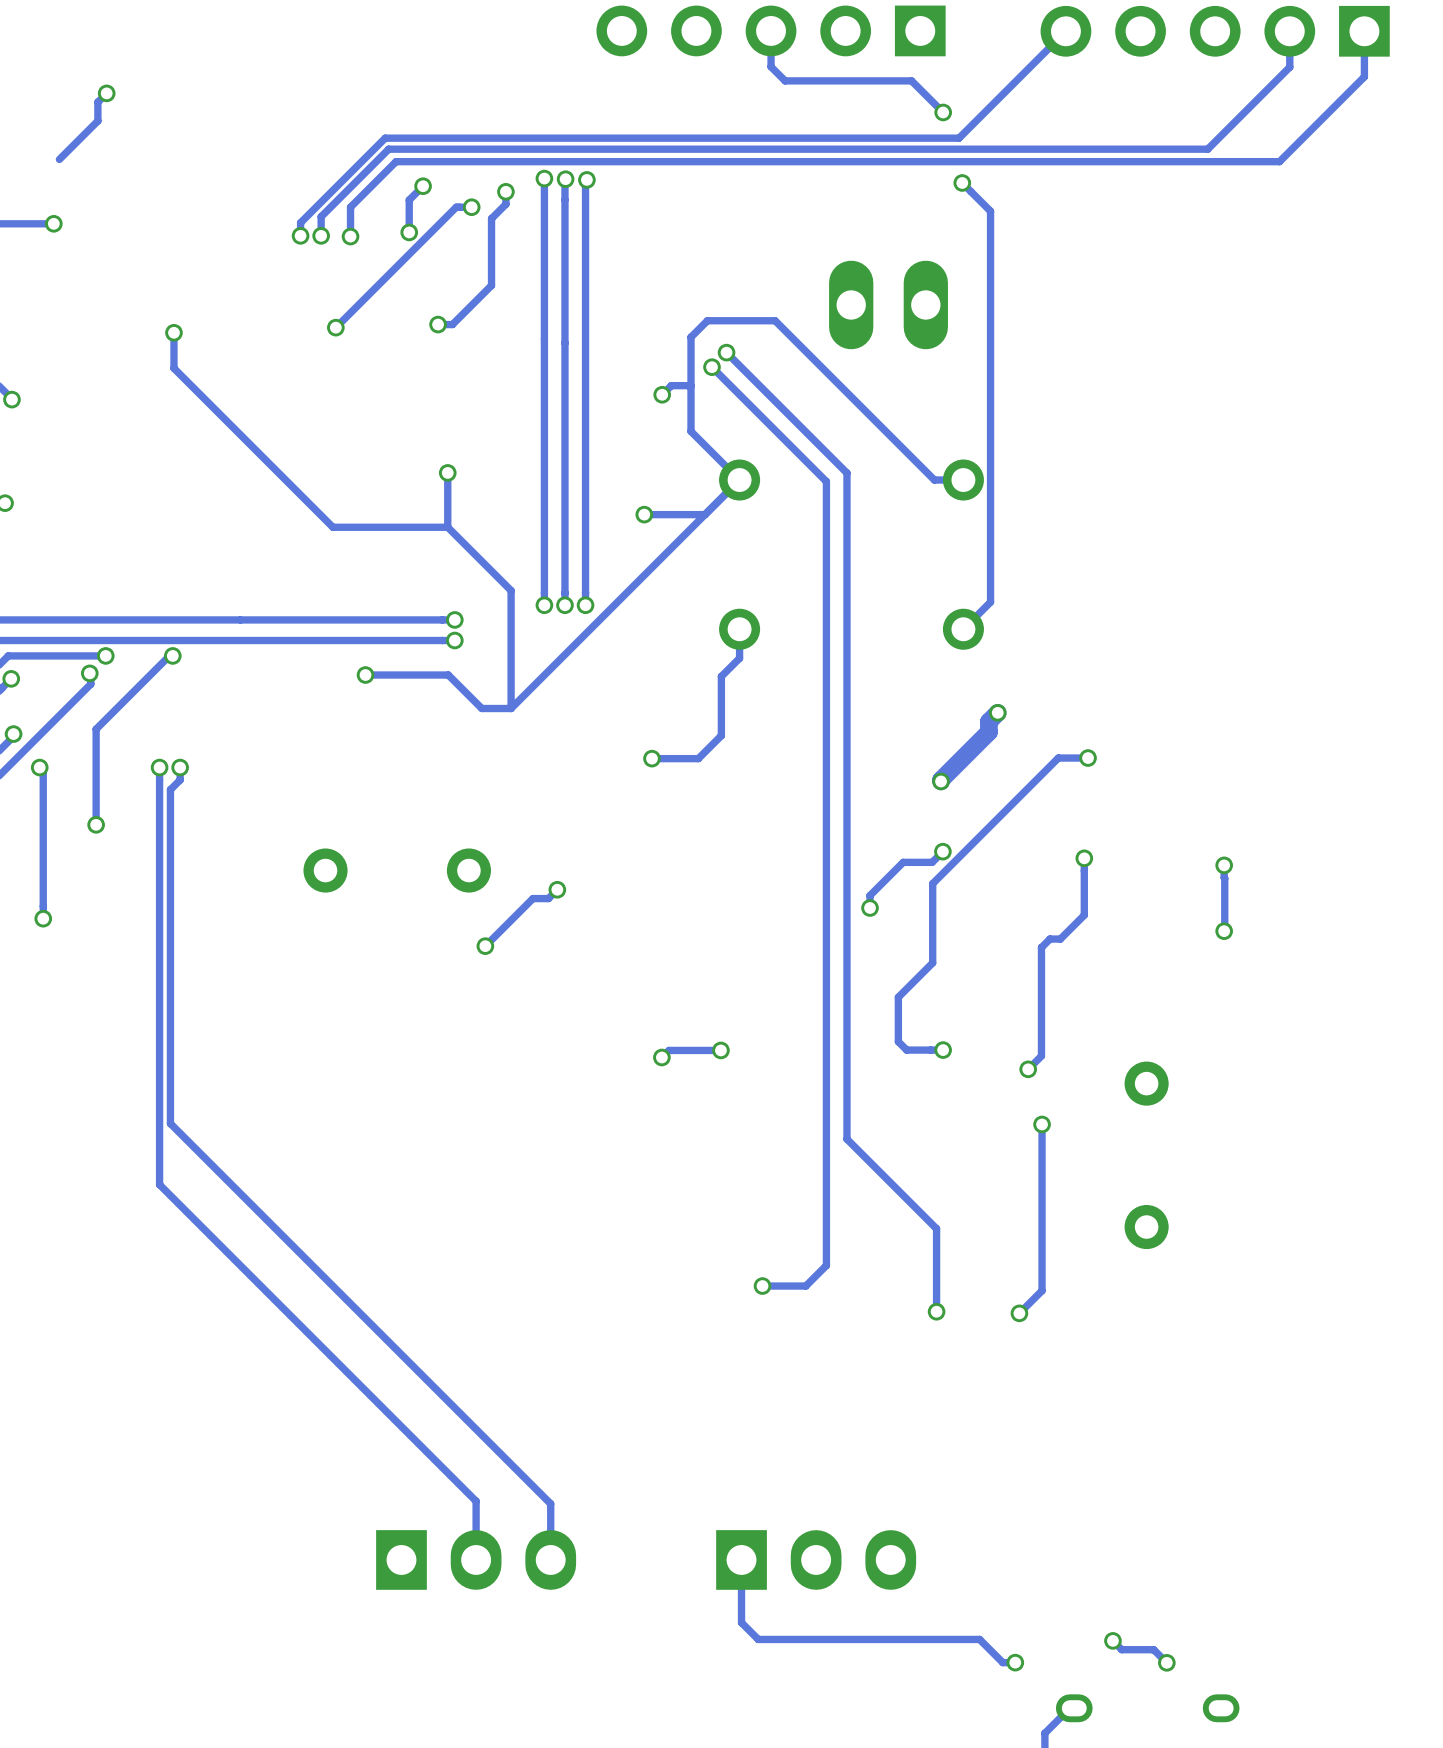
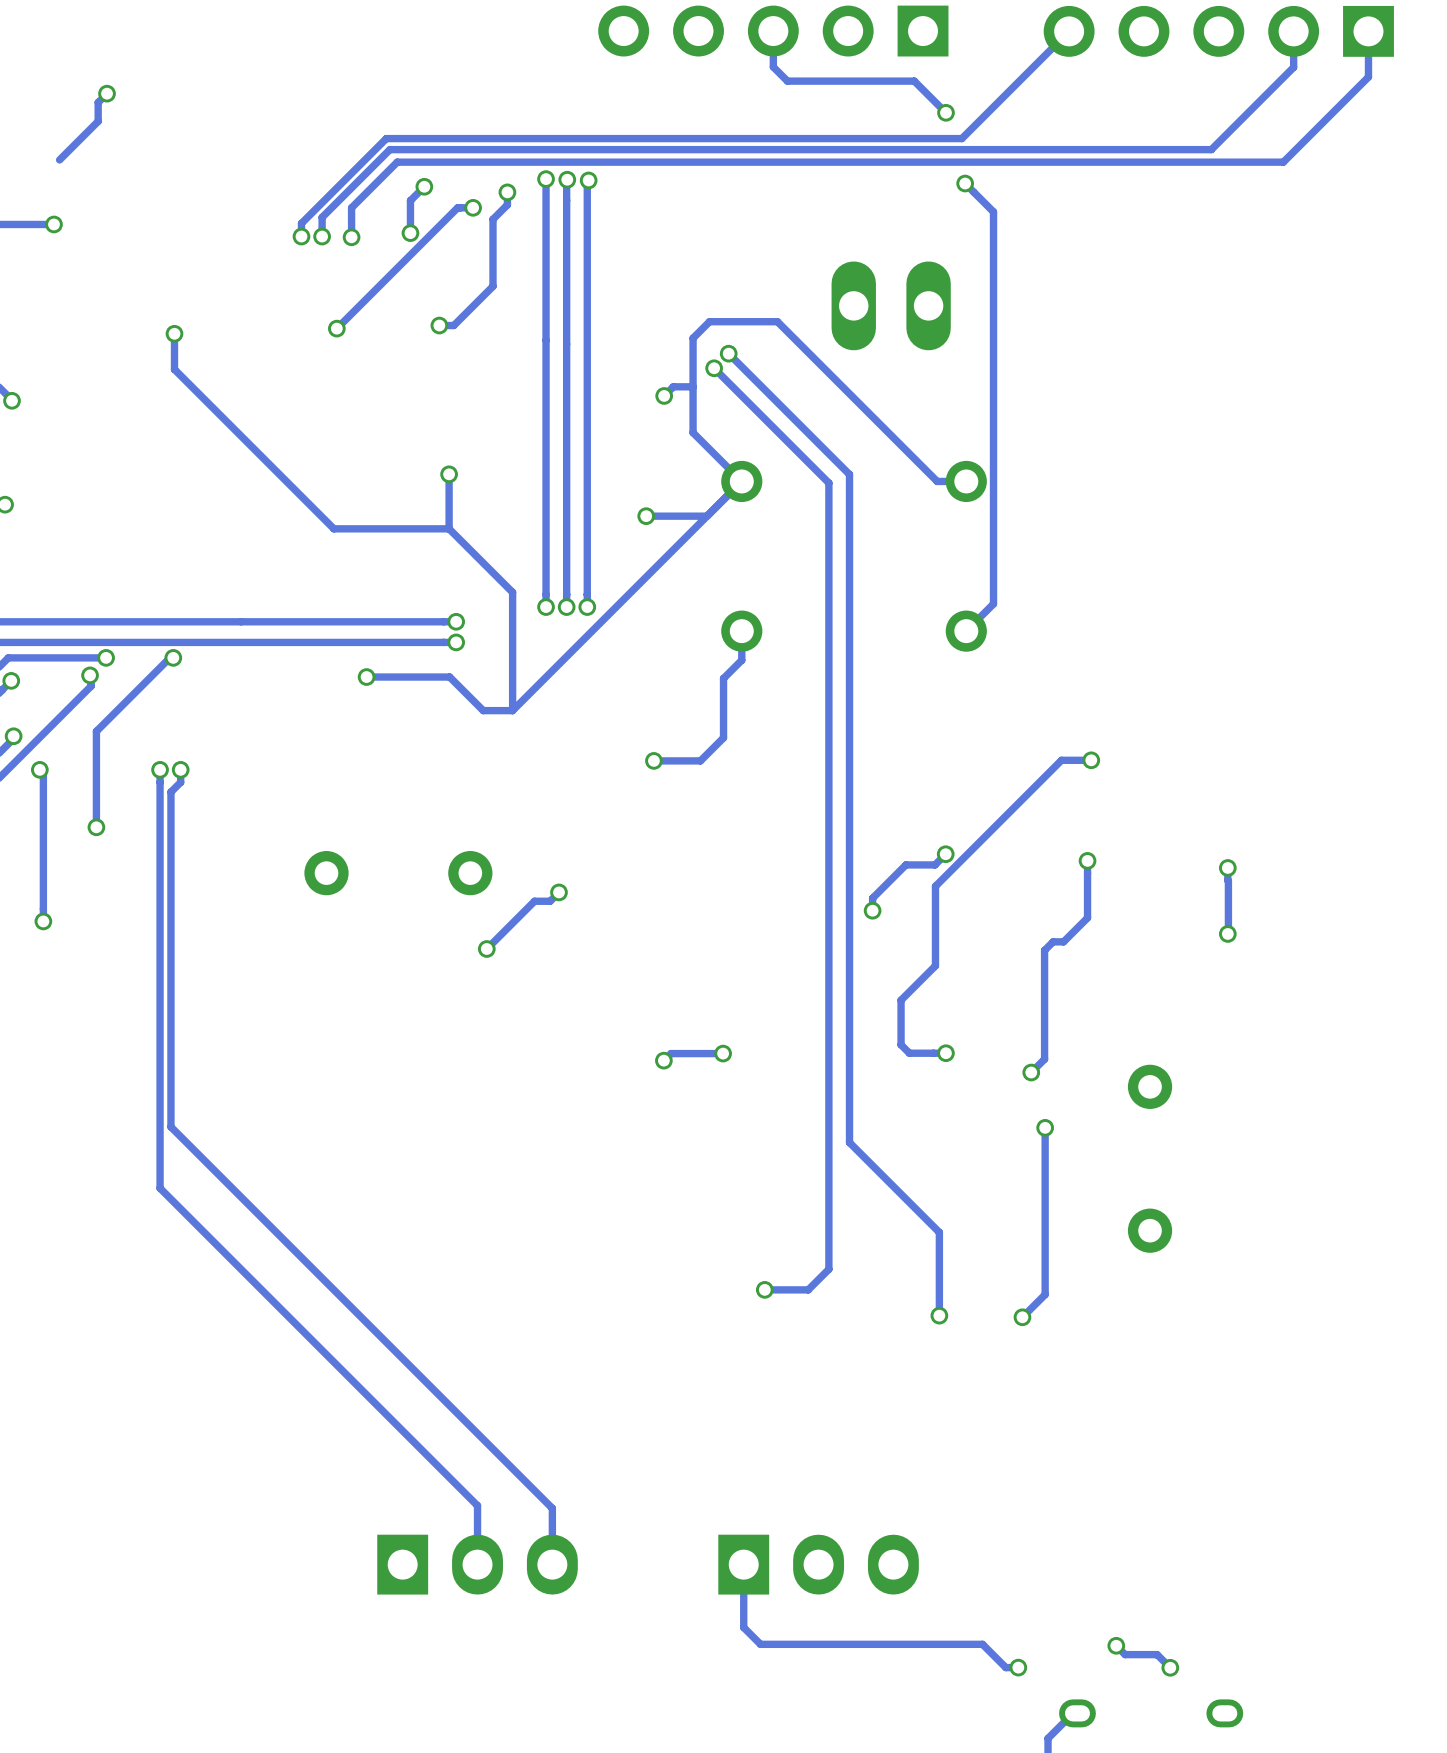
track: (997, 712) (988, 721) (988, 732) (941, 781) -> none
via: (997, 712) -> none
via: (941, 781) -> none

